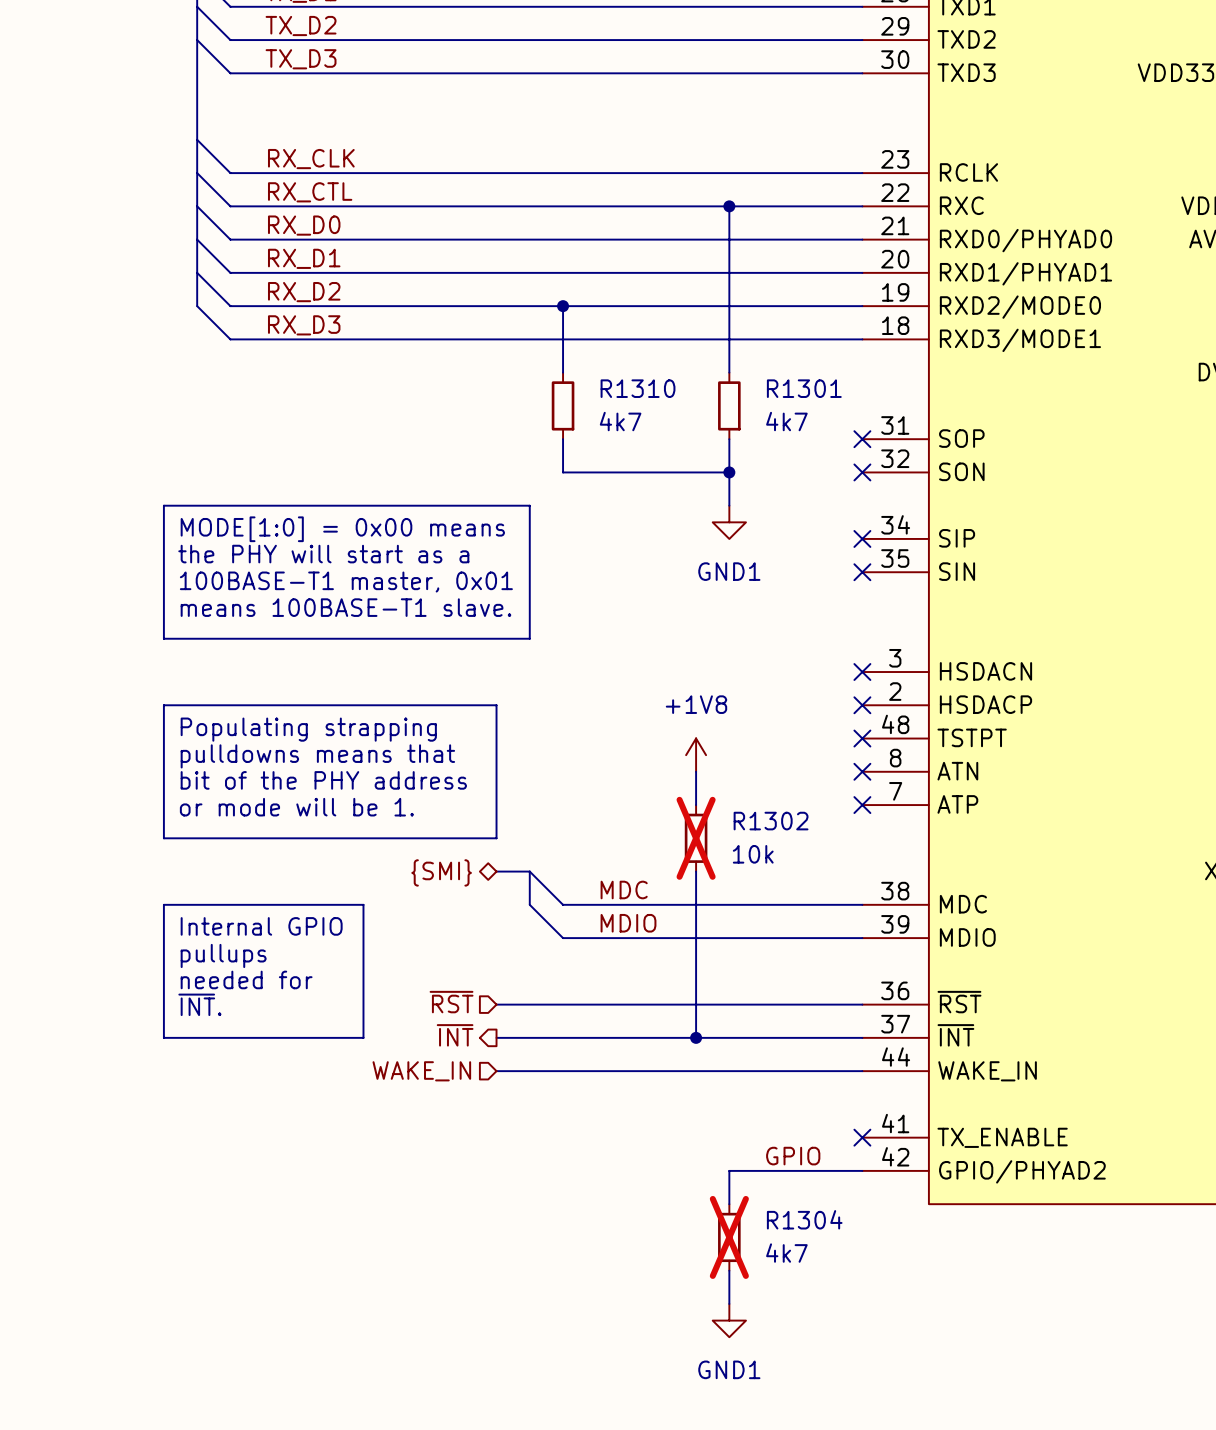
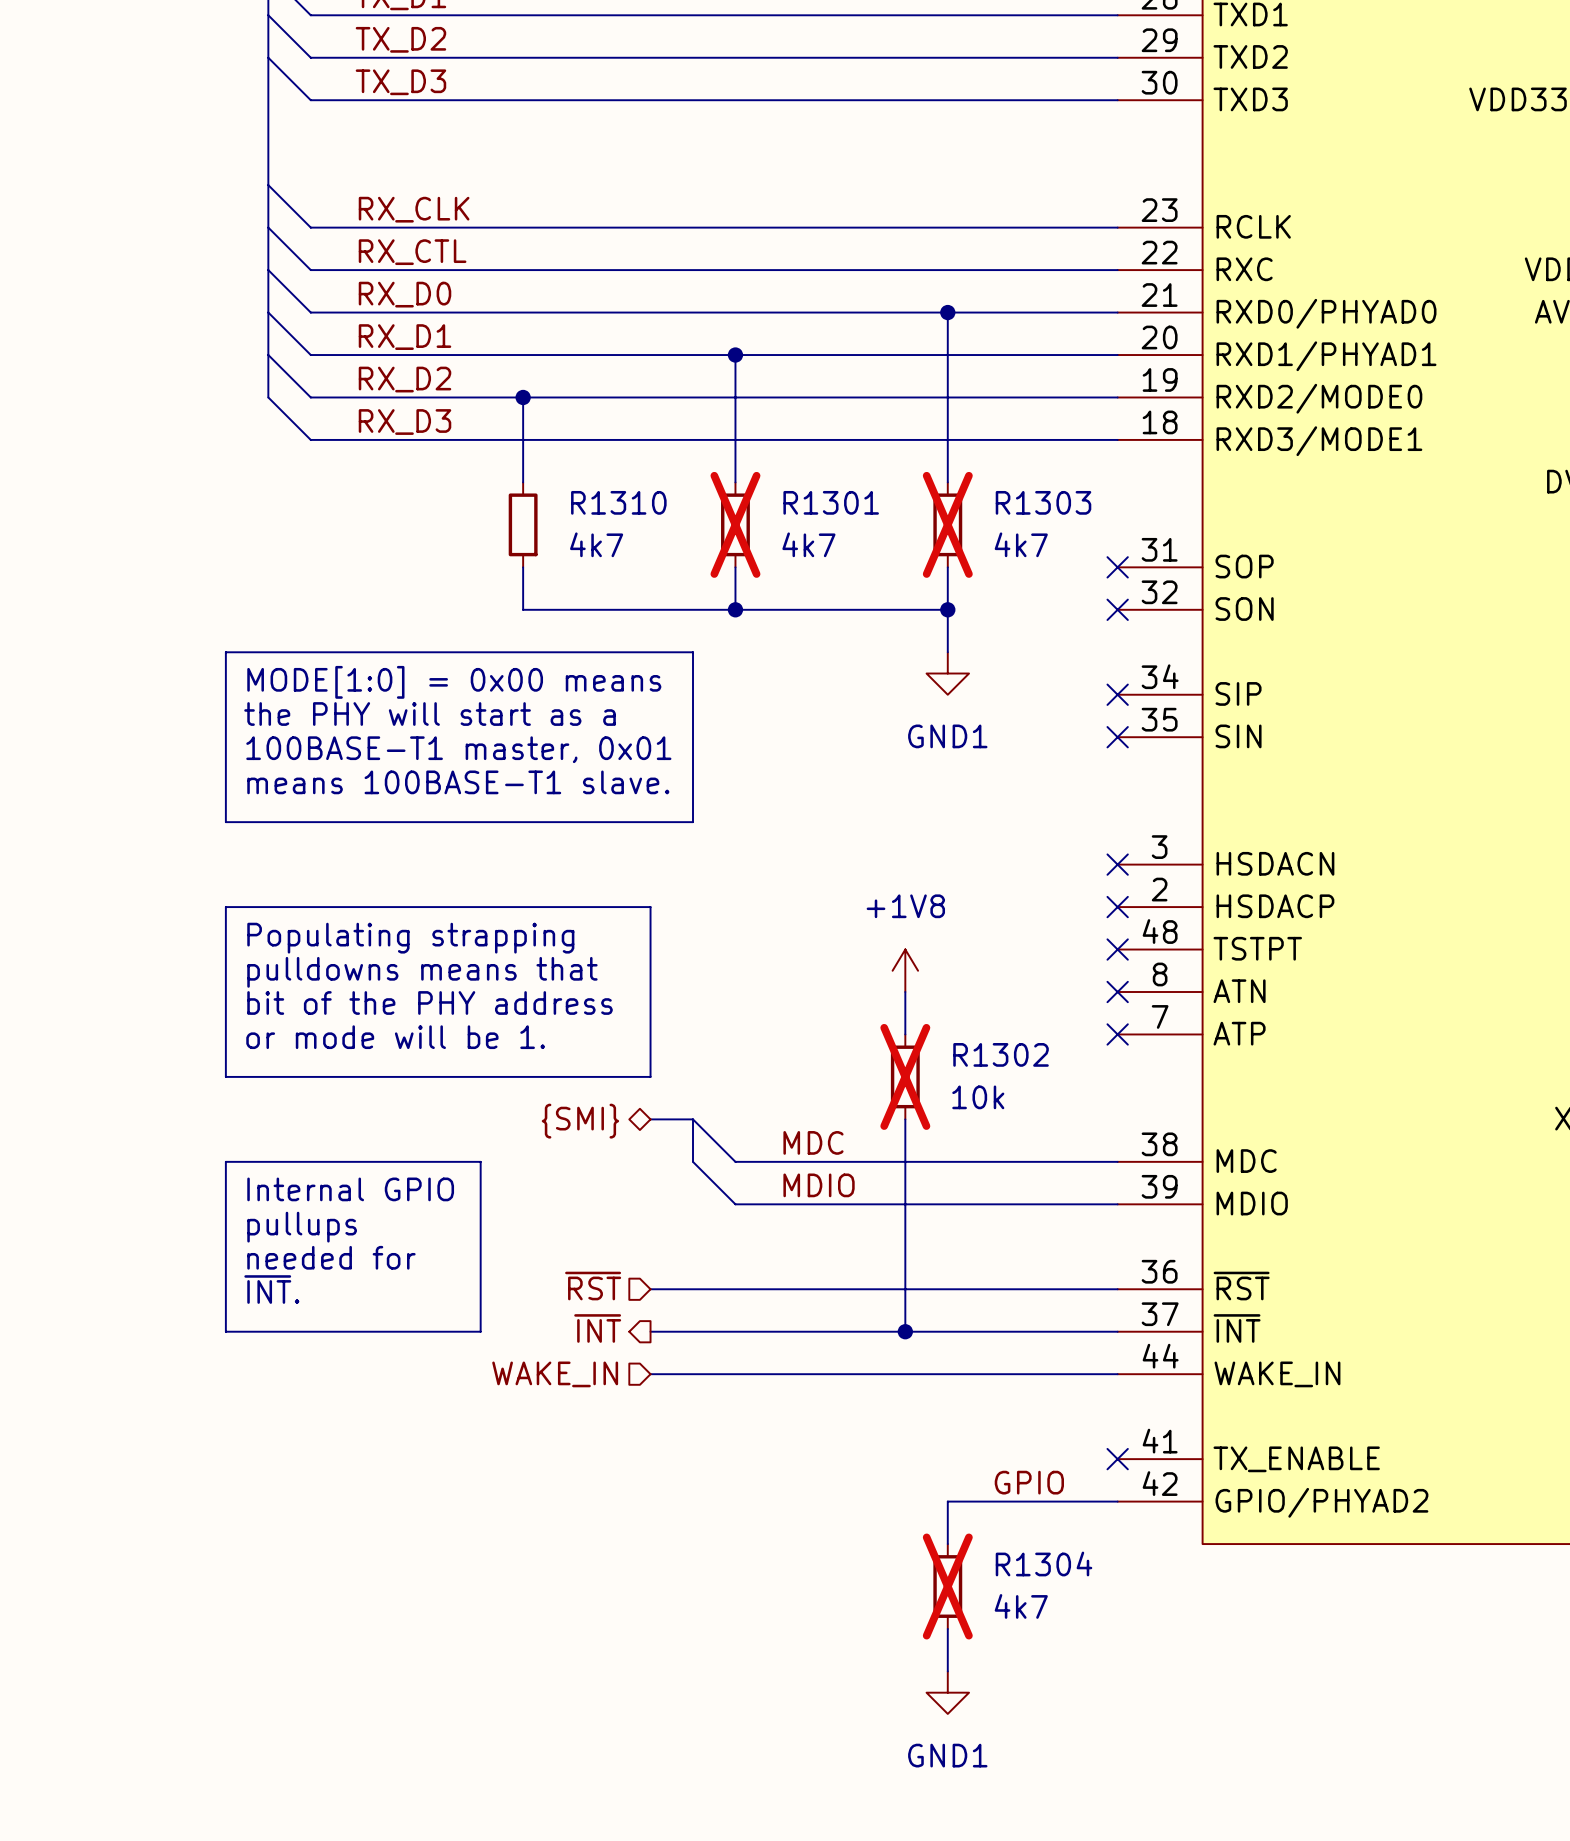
wire: (729, 206) (729, 239) -> (735, 355) (735, 397)
junction position: (729, 206) -> (947, 312)
wire: none -> (523, 397) (523, 482)
junction: none -> (523, 397)
junction position: (563, 306) -> (735, 355)
R1310 name: R1310 (638, 388) -> R1301 (831, 502)
R1301 name: R1301 (804, 388) -> R1303 (1043, 502)
R1310: none -> 4k7 (523, 524)
R1310 do-not-place cross: none -> (735, 524)
R1301 do-not-place cross: none -> (947, 524)
wire: none -> (523, 567) (523, 609) (735, 609)
junction: none -> (735, 609)

